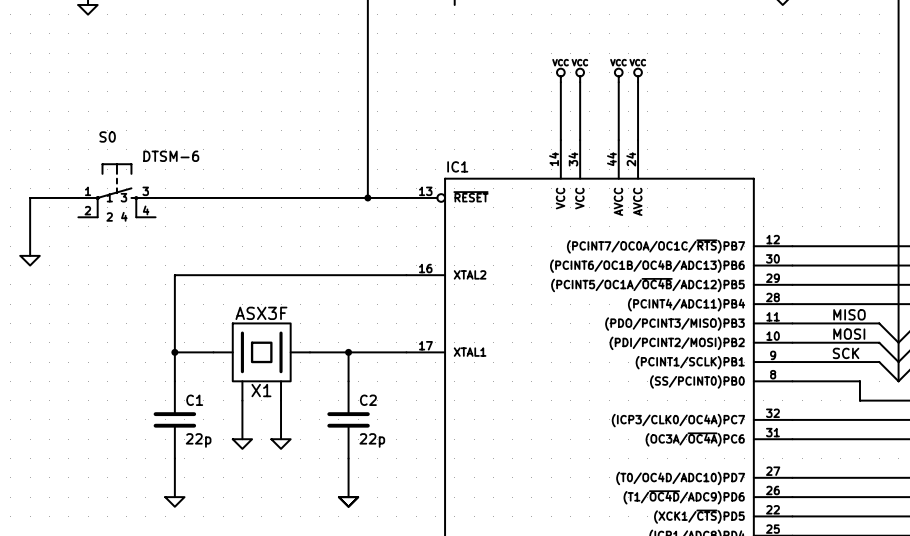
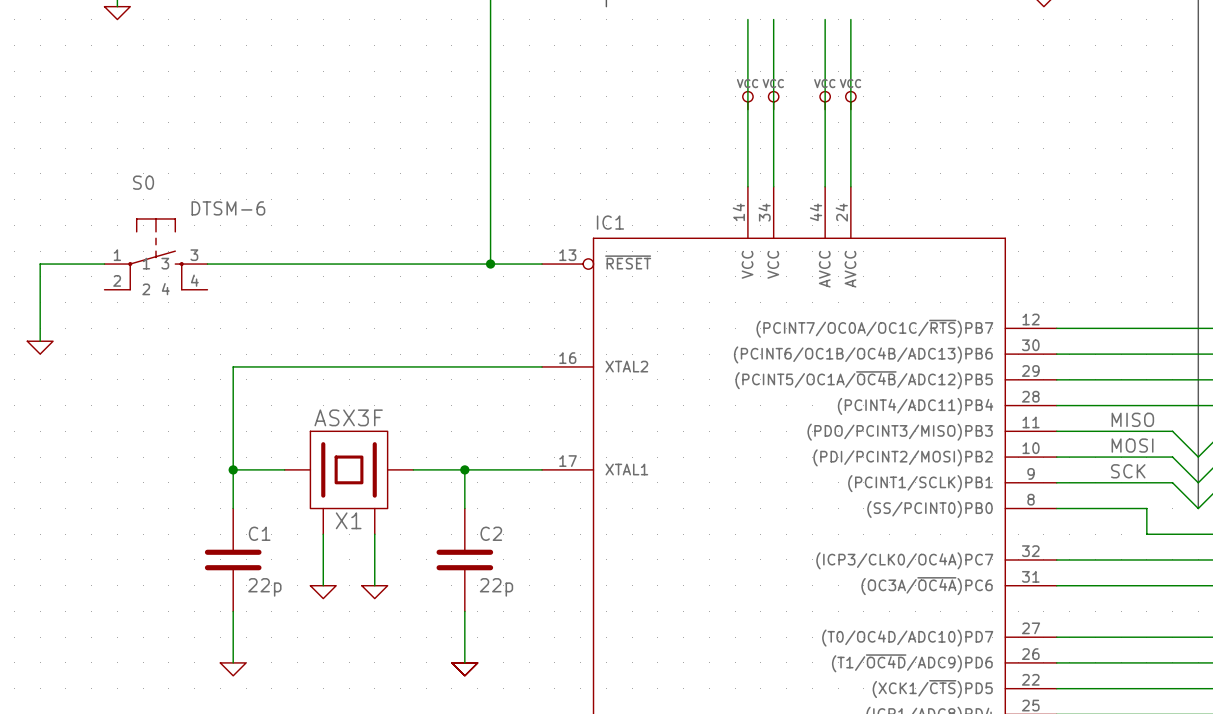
wire: none -> (747, 19) (747, 109)
wire: none -> (773, 19) (773, 109)
wire: none -> (825, 19) (825, 109)
wire: none -> (850, 19) (850, 109)

